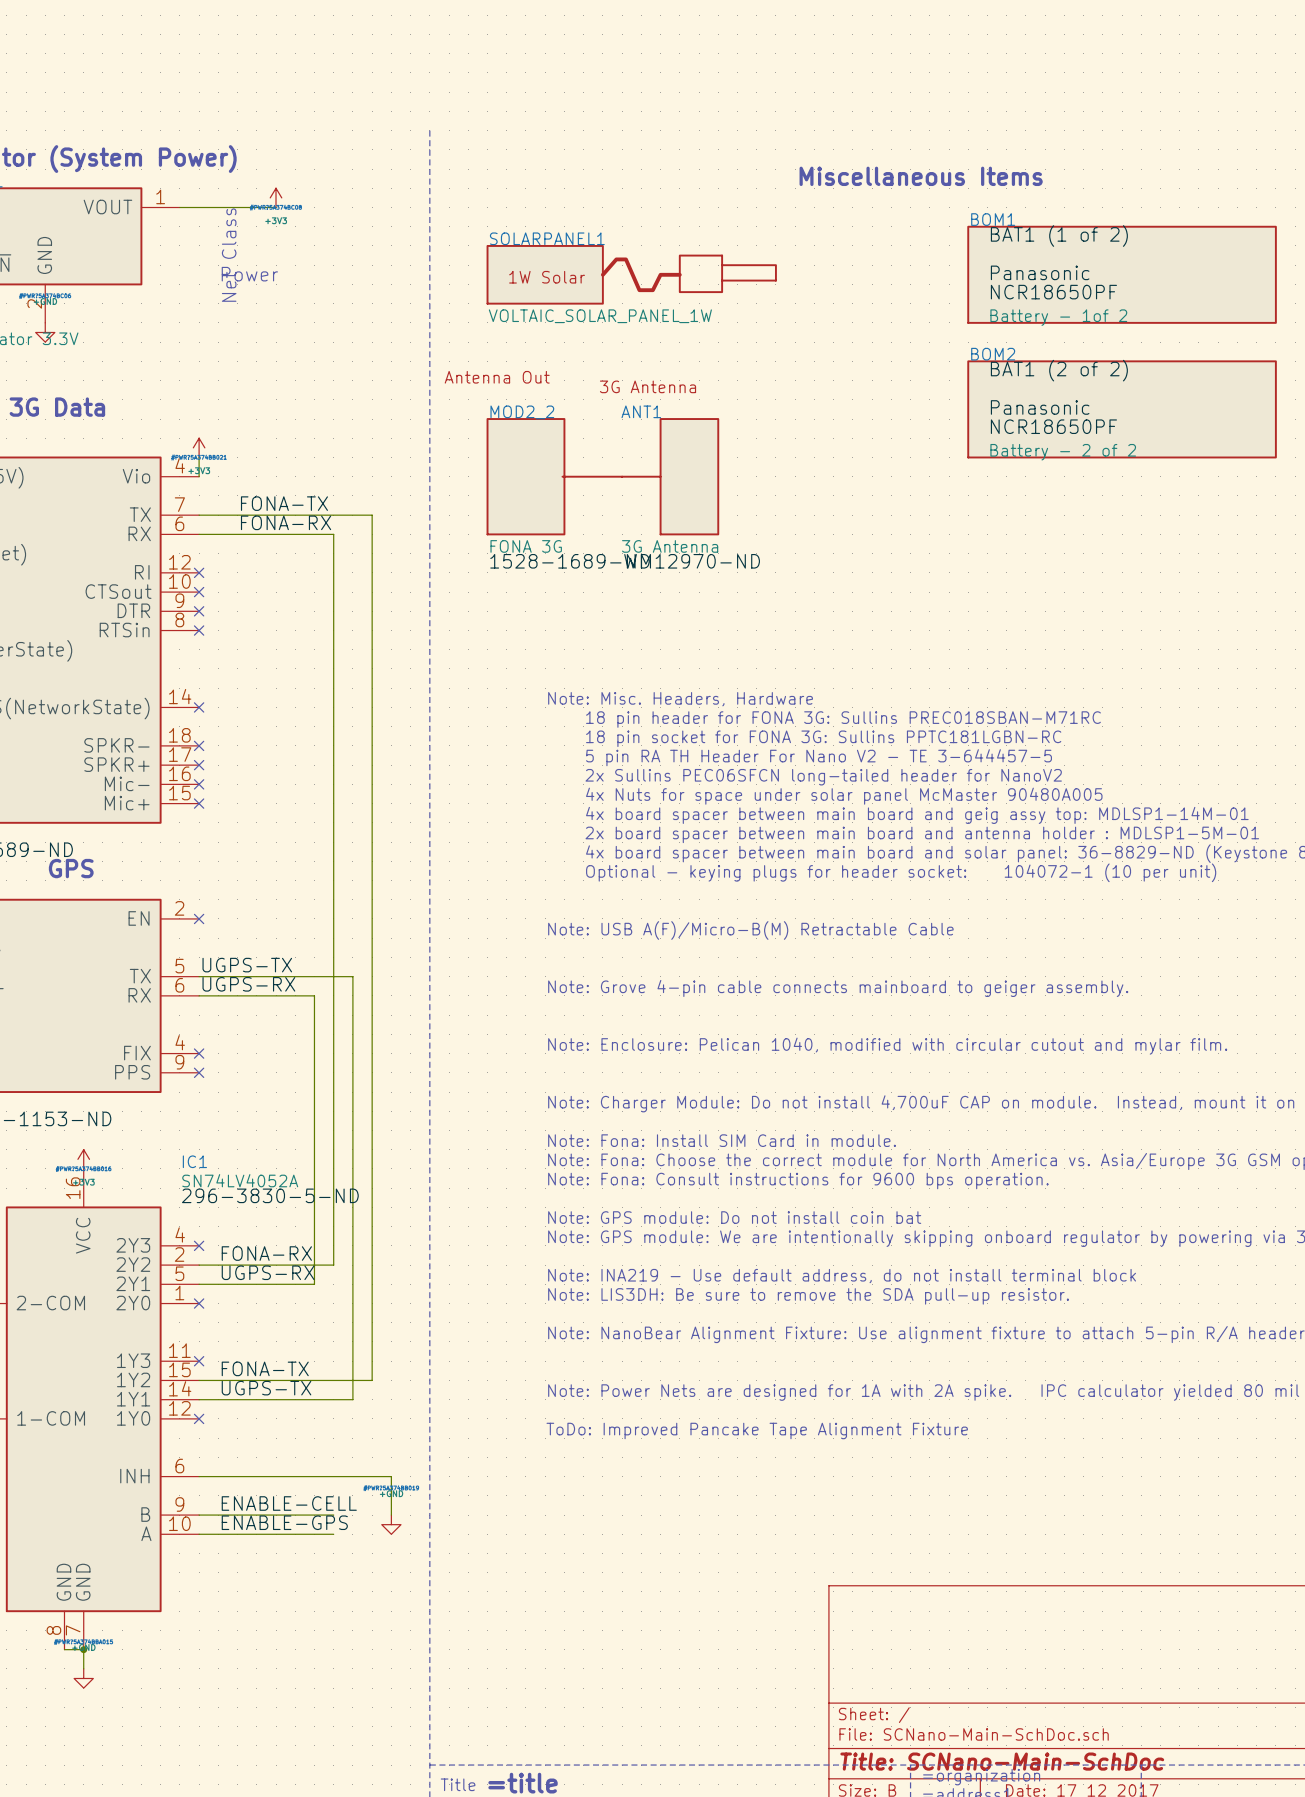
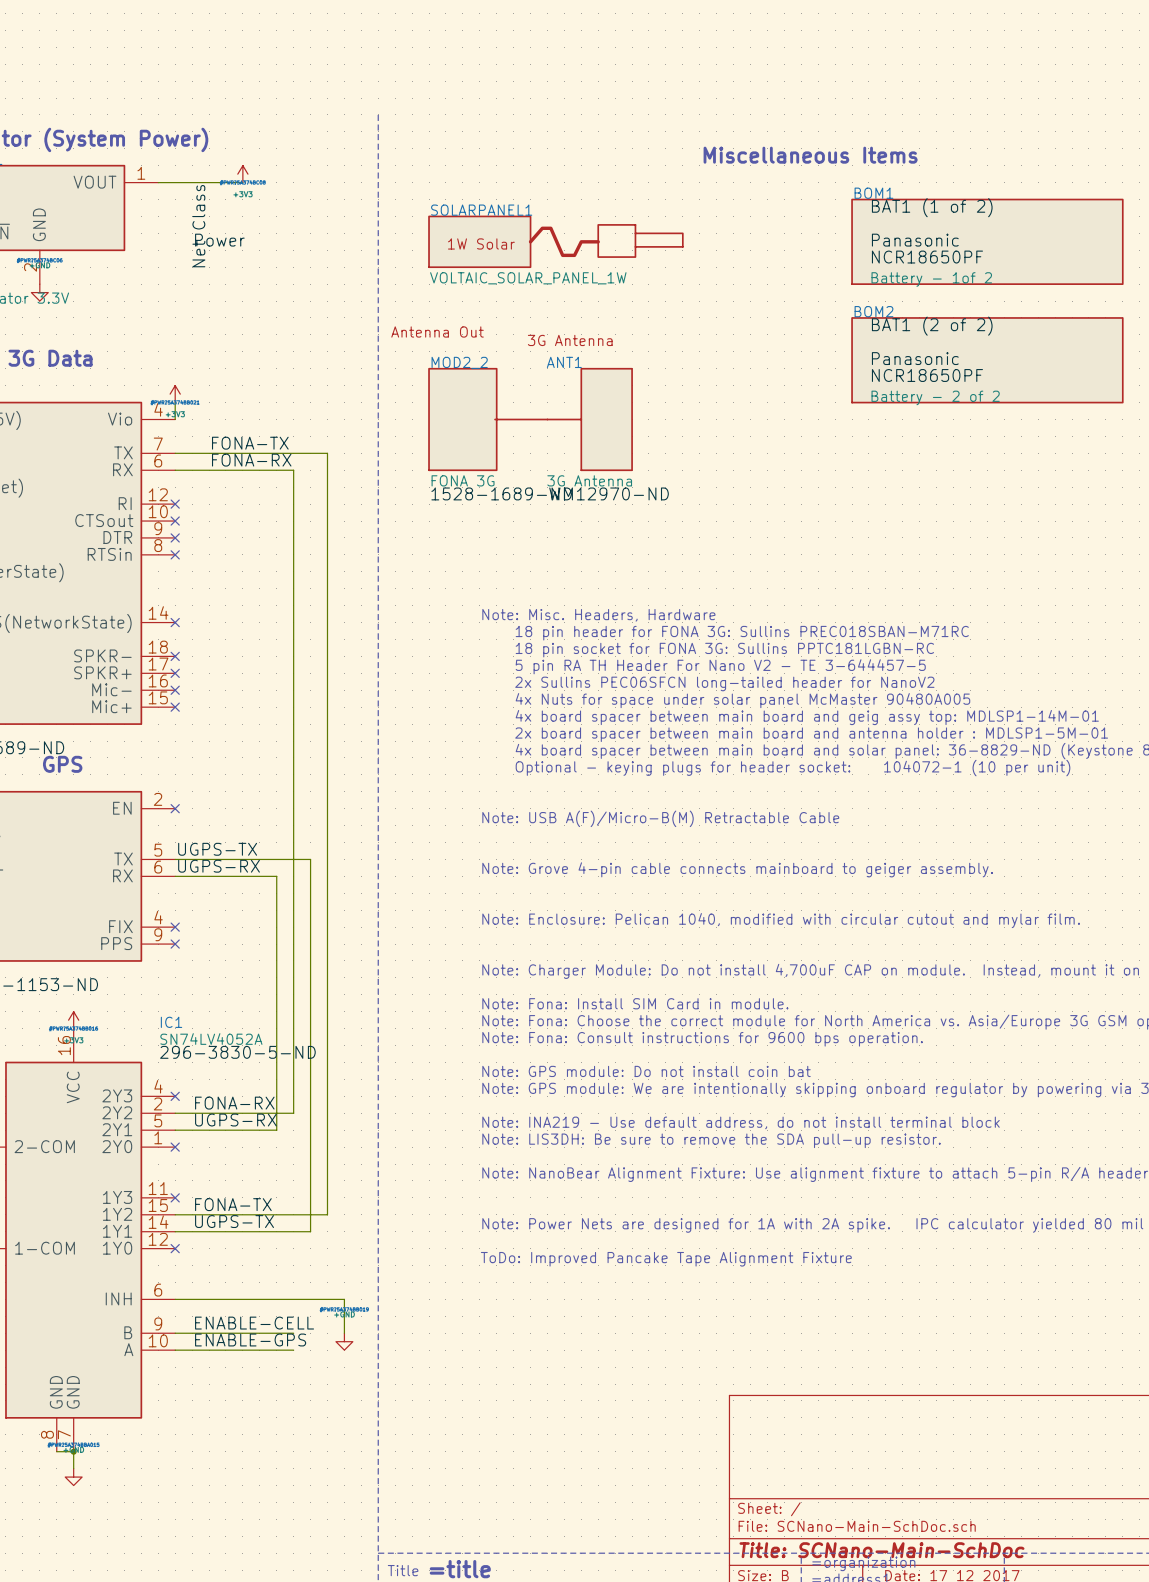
text: Net Class (229, 255) -> none
label: none -> Net Class (198, 226)
label: none -> Power (219, 240)
text: Power (249, 274) -> none

